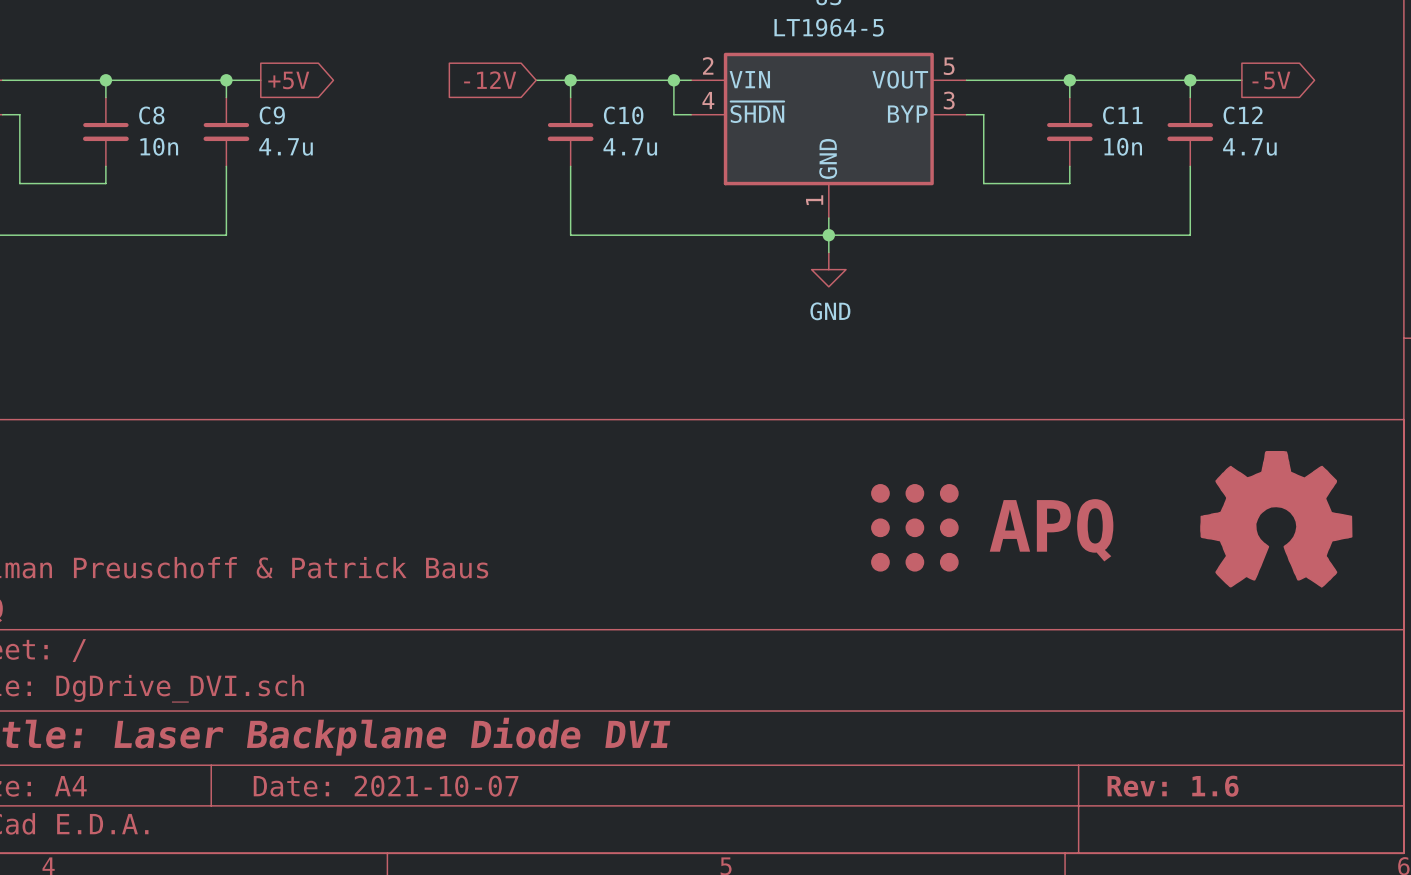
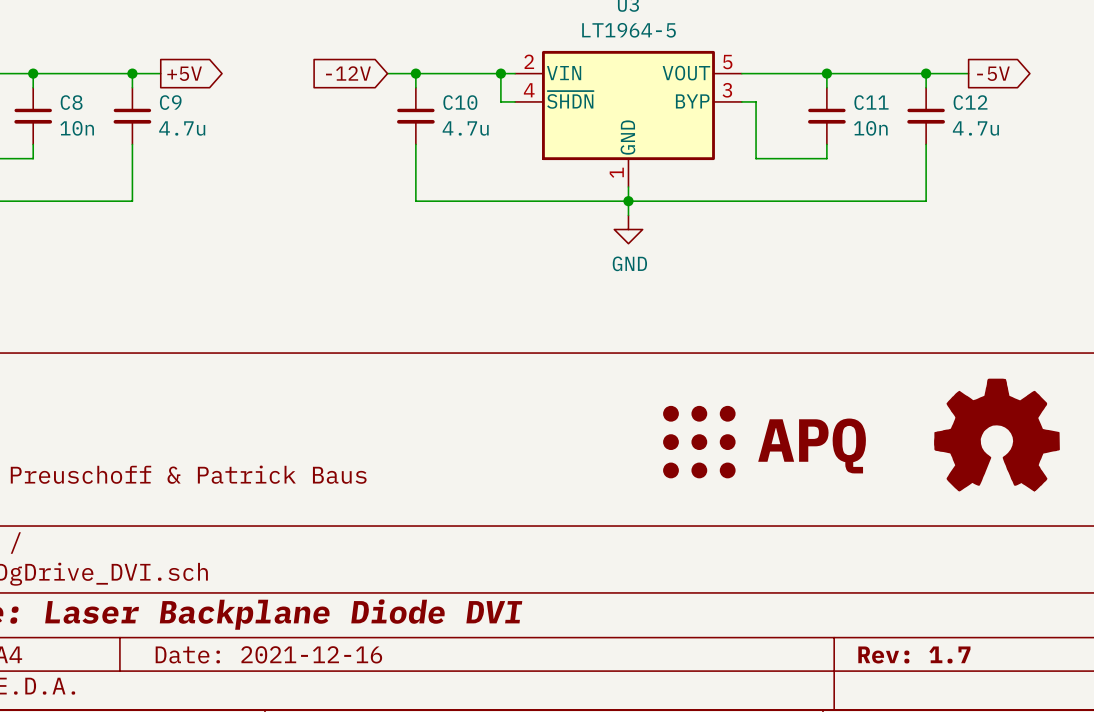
title block: Date: 2021-10-07 (386, 786) -> Date: 2021-12-16 (268, 654)
title block: Rev: 1.6 (1173, 786) -> Rev: 1.7 (914, 654)

